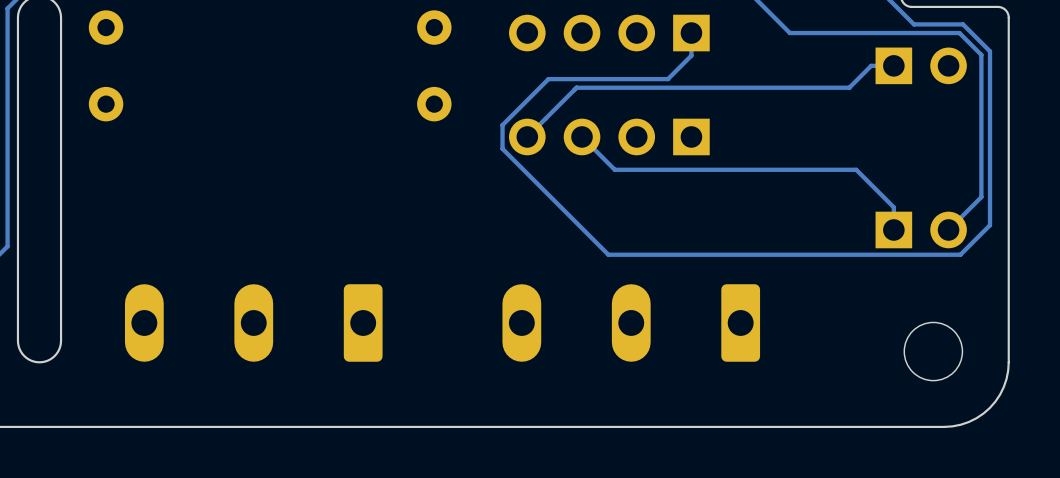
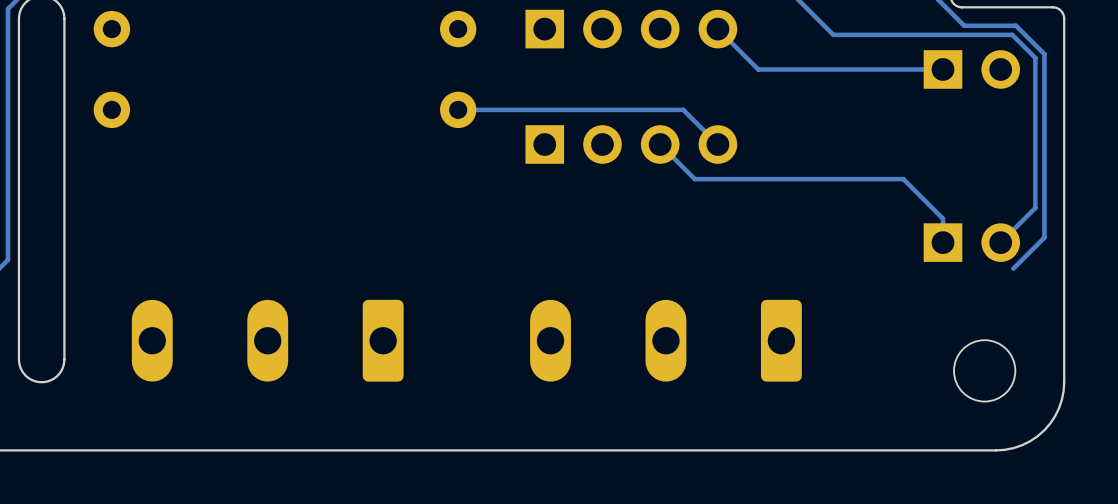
part rotation: 0° (609, 33) -> 180° (631, 29)
track: (691, 33) (691, 55) (667, 79) (548, 79) (502, 125) (502, 148) (608, 254) (960, 254) -> none
track: (871, 65) (849, 87) (576, 87) (527, 136) -> (919, 69) (758, 69) (717, 29)
track: none -> (458, 109) (683, 109) (717, 144)
track: (582, 136) (614, 169) (658, 169) -> (660, 144) (694, 179)
part rotation: 0° (609, 136) -> 180° (631, 144)

